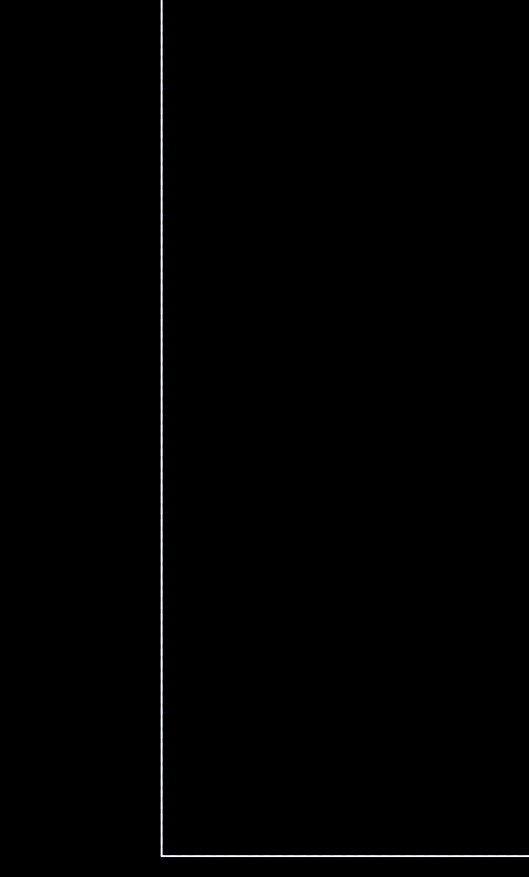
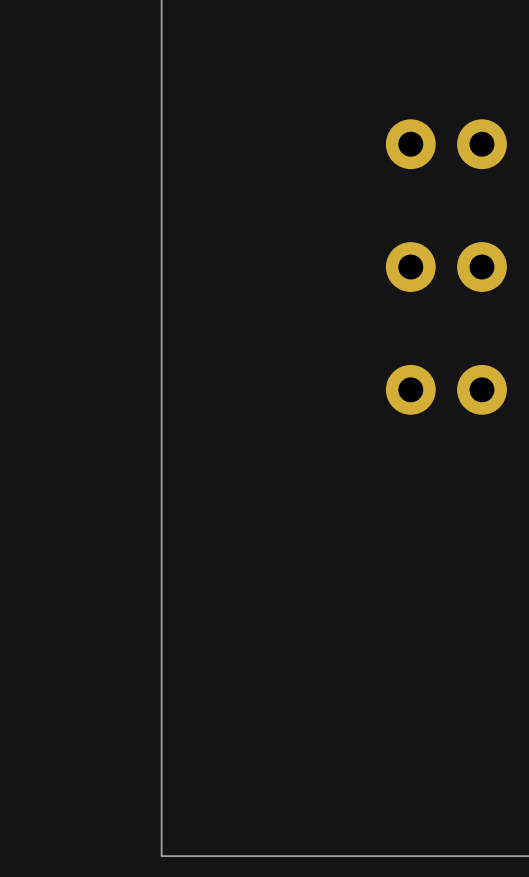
part: none -> (446, 144)
part: none -> (446, 267)
part: none -> (446, 389)

